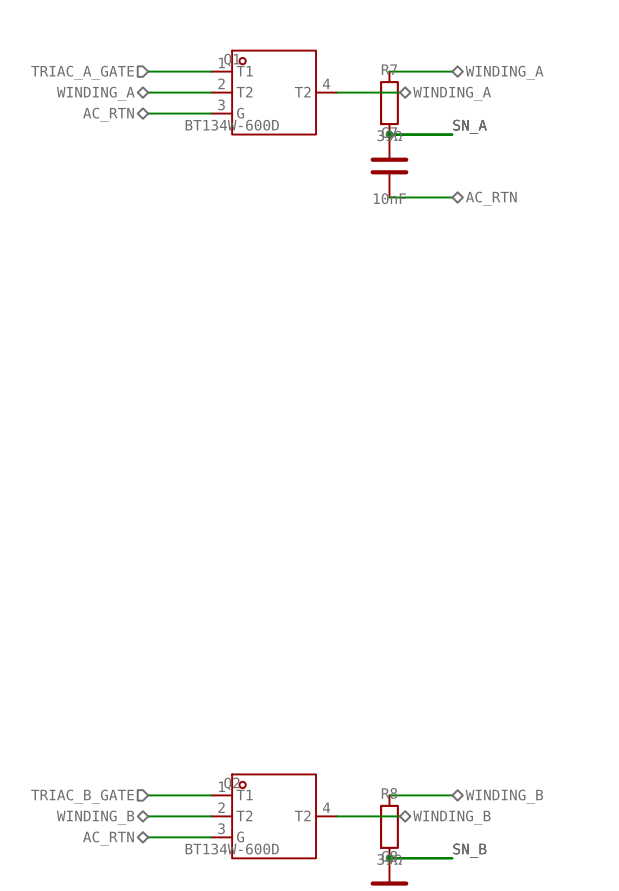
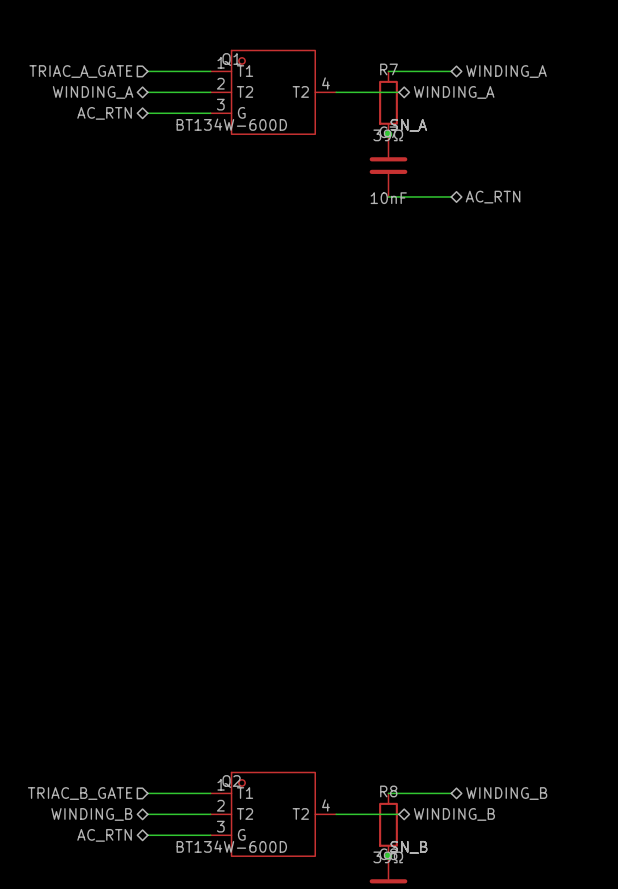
label position: SN_A (470, 126) -> SN_A (408, 125)
wire: (389, 134) (452, 134) -> none
label position: SN_B (469, 850) -> SN_B (409, 847)
wire: (389, 858) (452, 858) -> none

